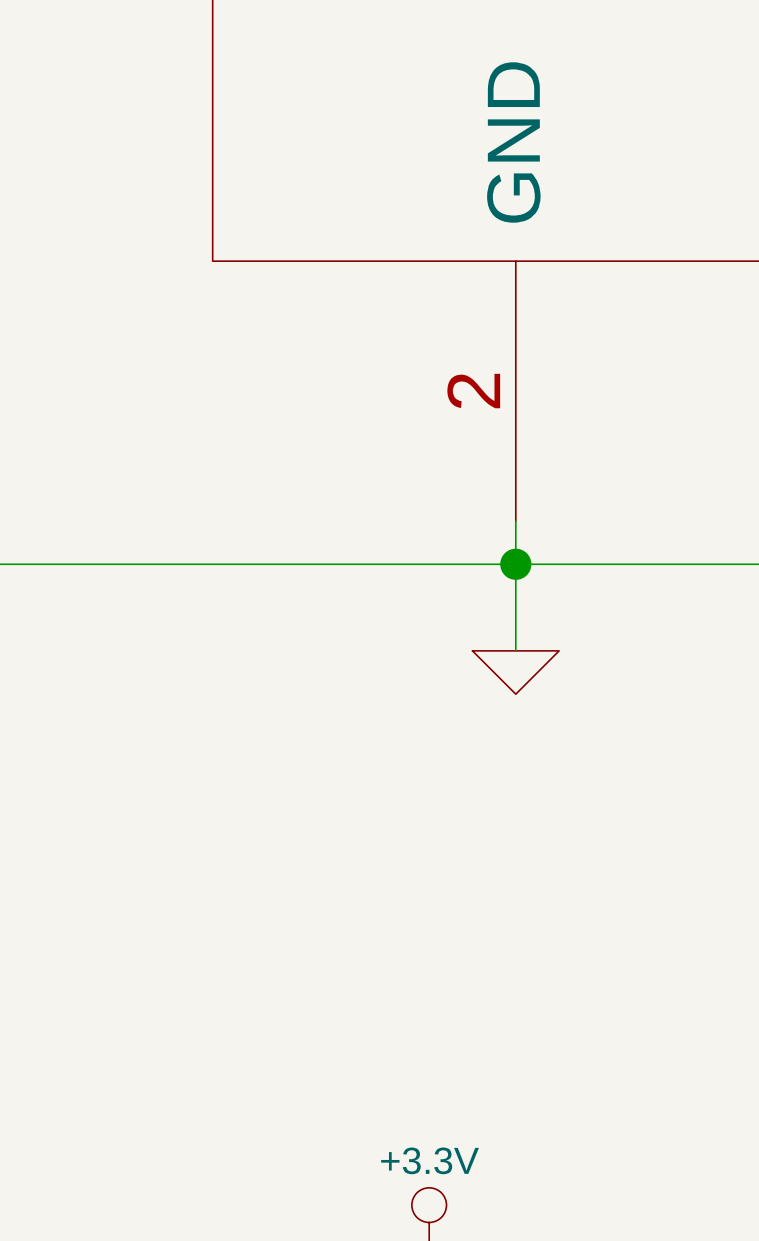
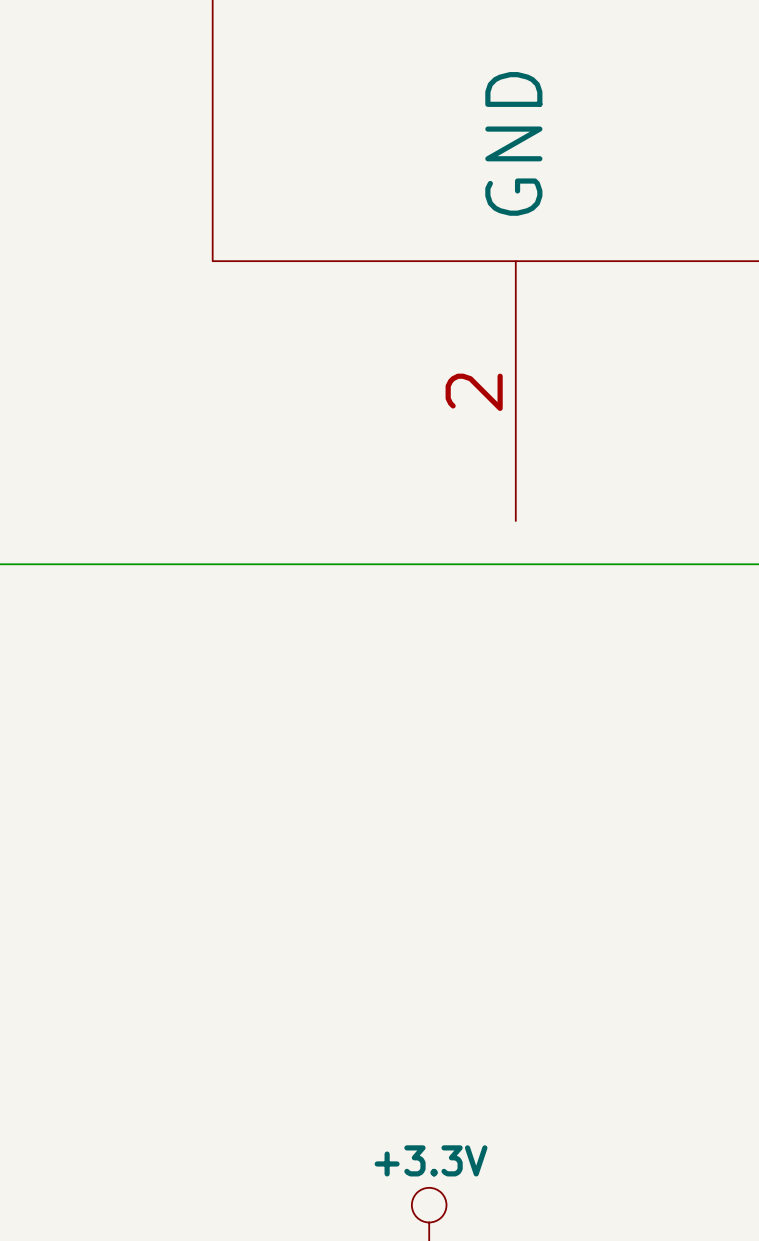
wire: (515, 520) (515, 650) -> none
junction: (515, 564) -> none
power symbol: (515, 672) -> none

